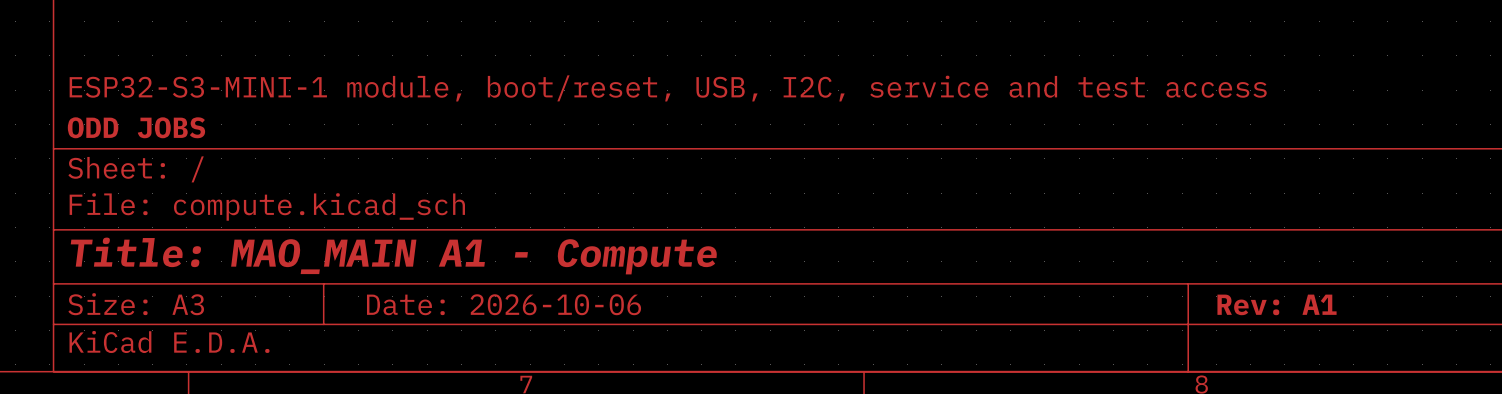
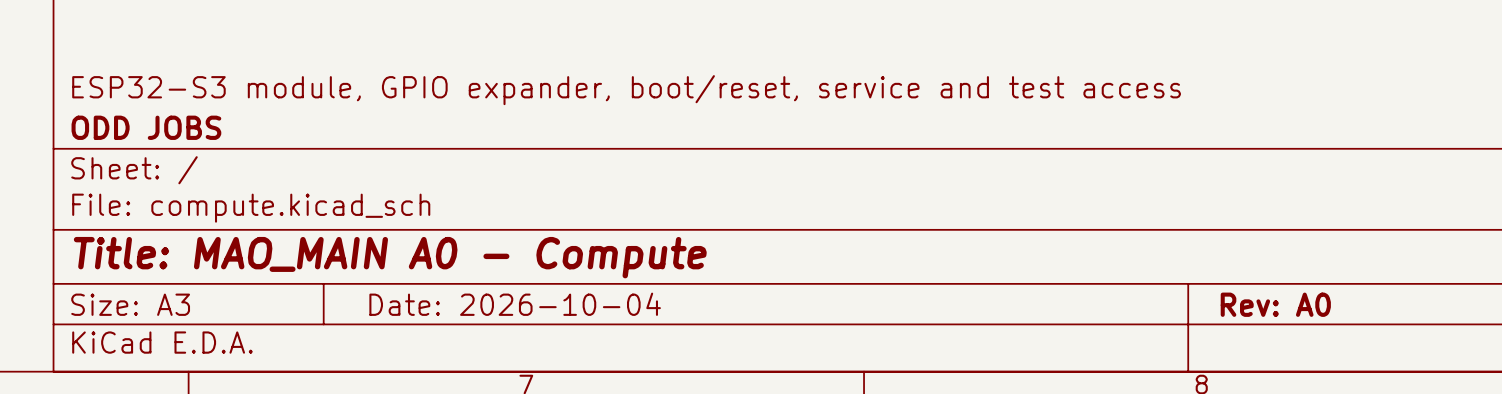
title block: ESP32-S3-MINI-1 module, boot/reset, USB, I2C, service and test access (668, 88) -> ESP32-S3 module, GPIO expander, boot/reset, service and test access (626, 90)
title block: Title: MAO_MAIN A1 - Compute (393, 255) -> Title: MAO_MAIN A0 - Compute (390, 257)
title block: Date: 2026-10-06 (504, 304) -> Date: 2026-10-04 (515, 304)
title block: Rev: A1 (1277, 304) -> Rev: A0 (1275, 304)

